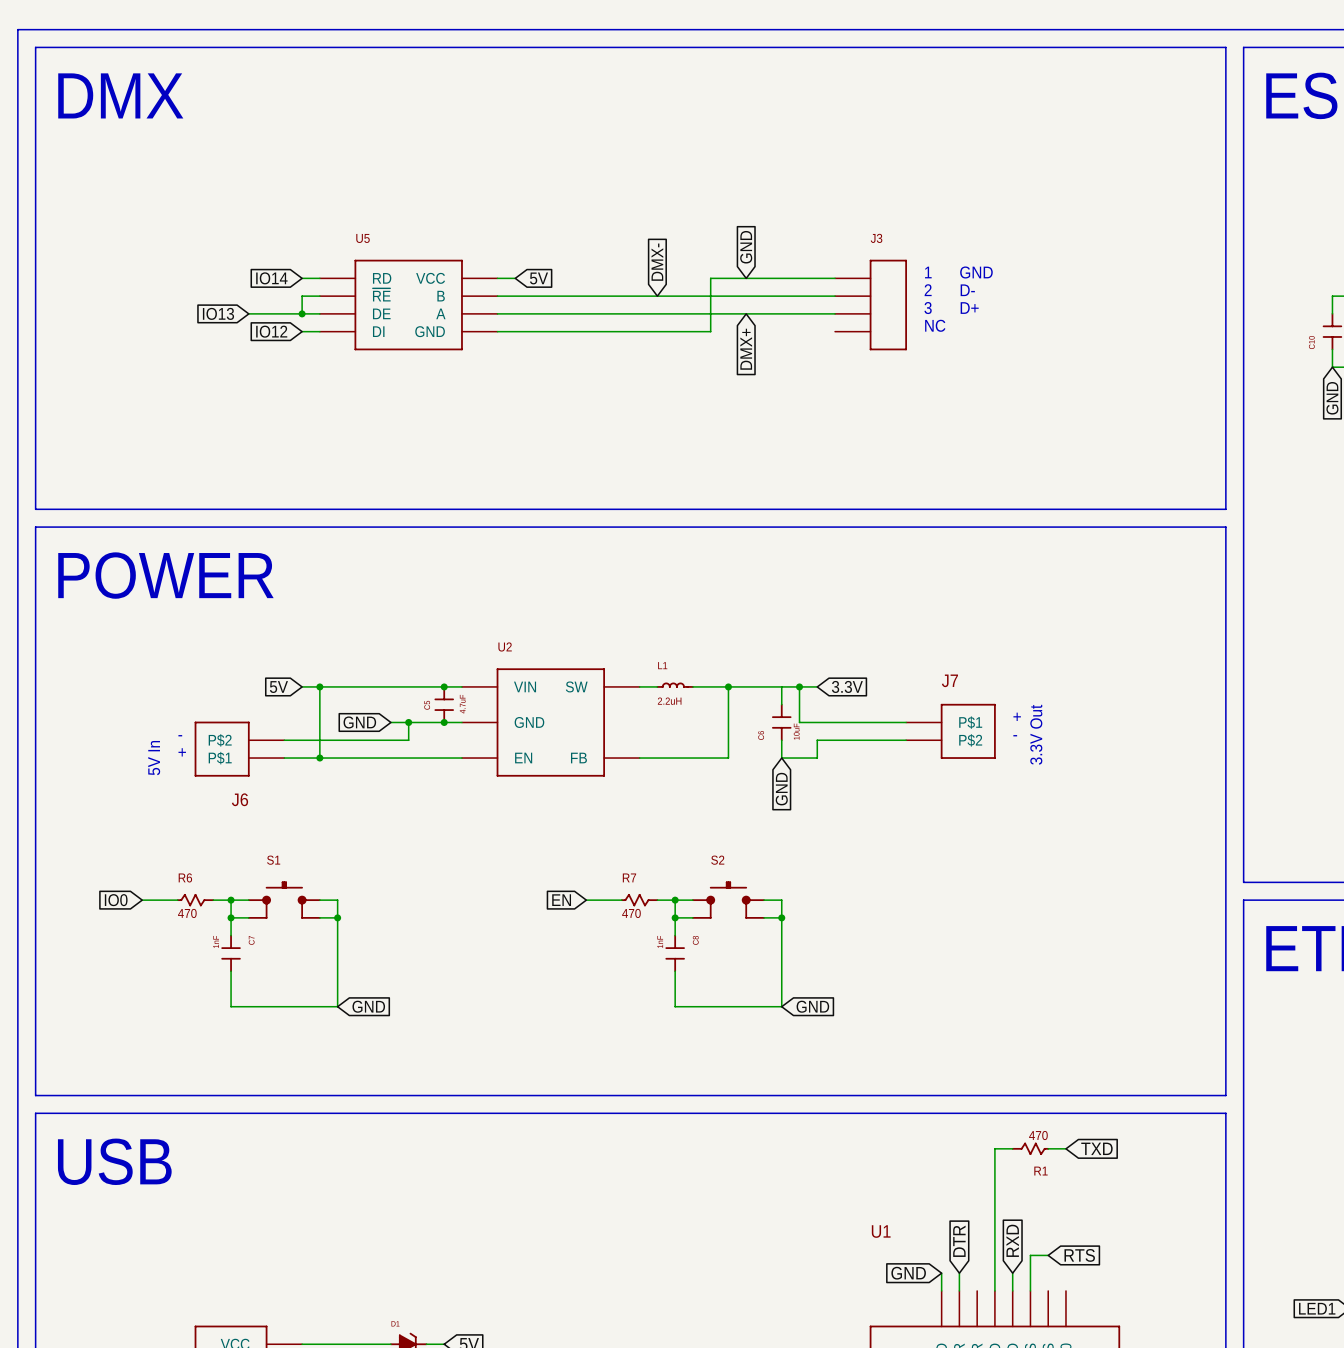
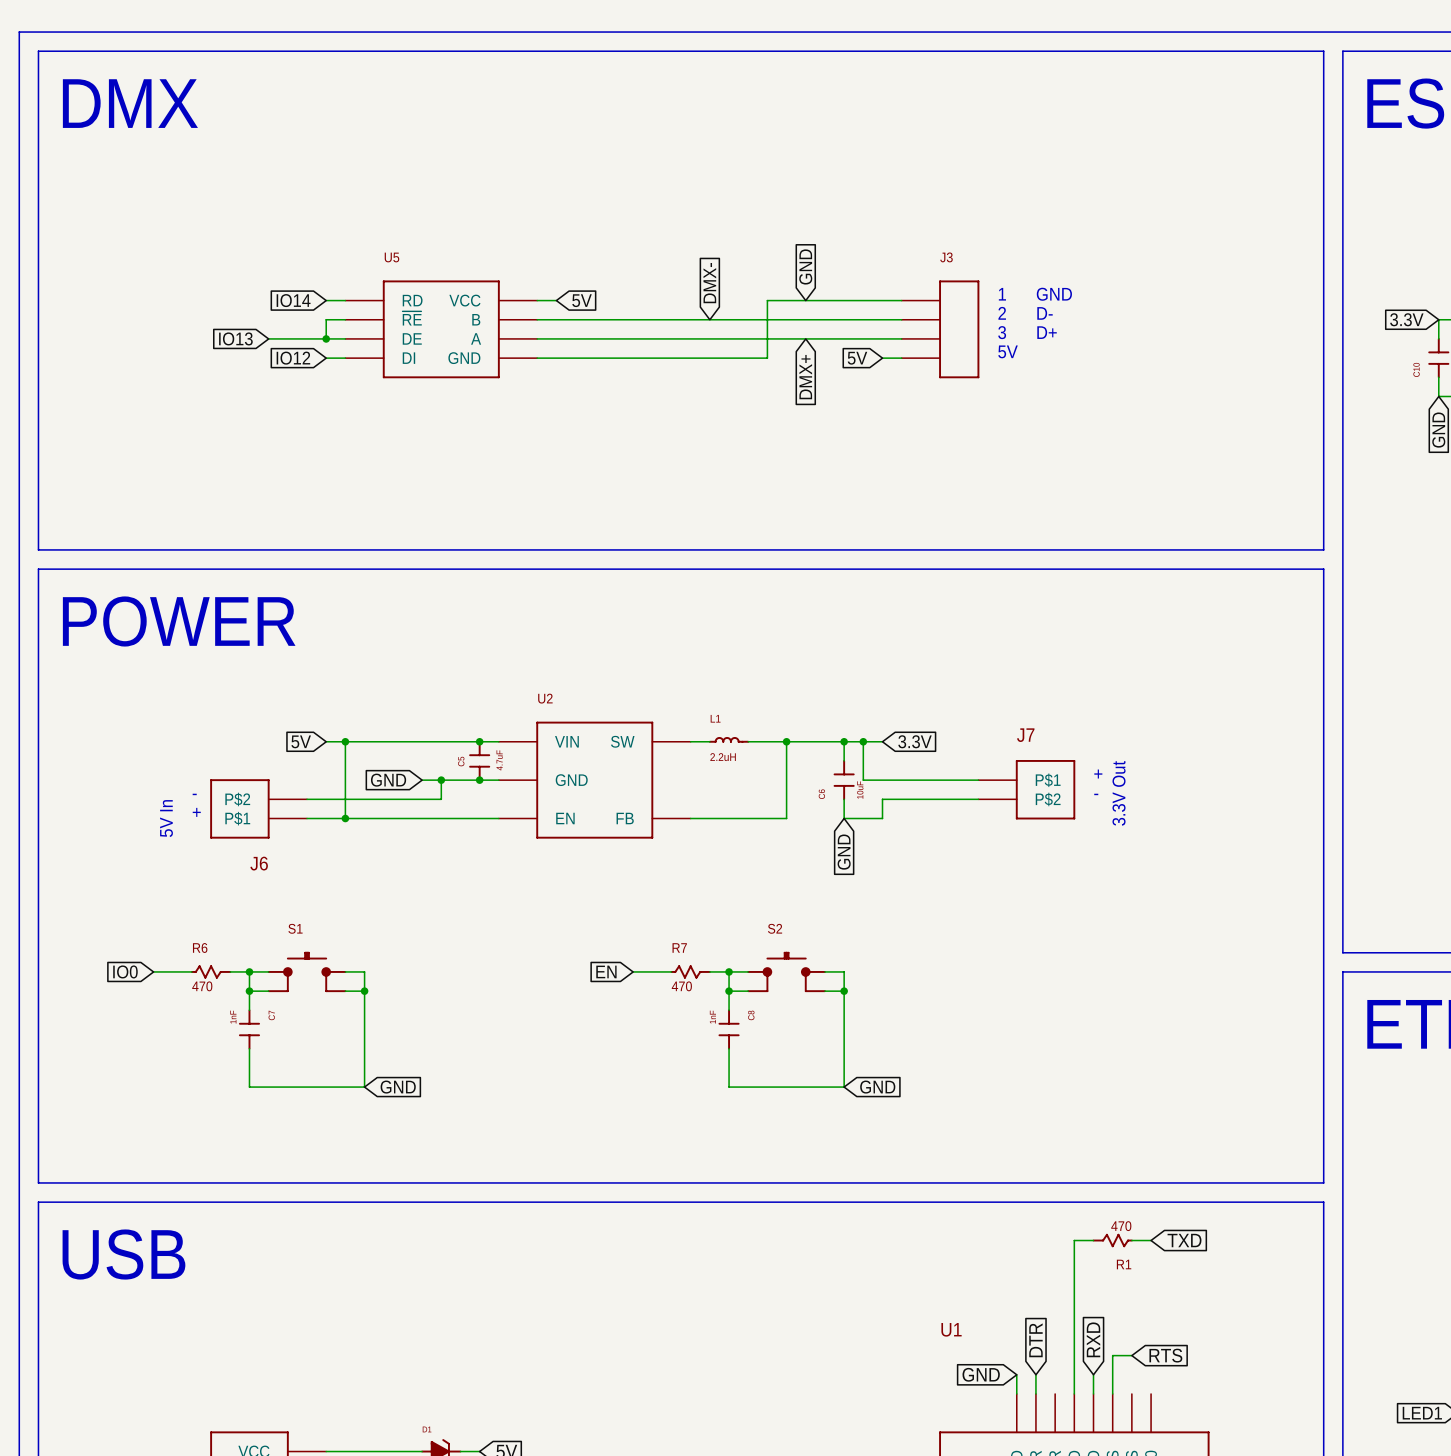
global label: none -> 3.3V (1406, 319)
text: NC (935, 325) -> 5V (1008, 351)
global label: none -> 5V (857, 358)
wire: none -> (882, 358) (901, 358)
junction: none -> (844, 741)

